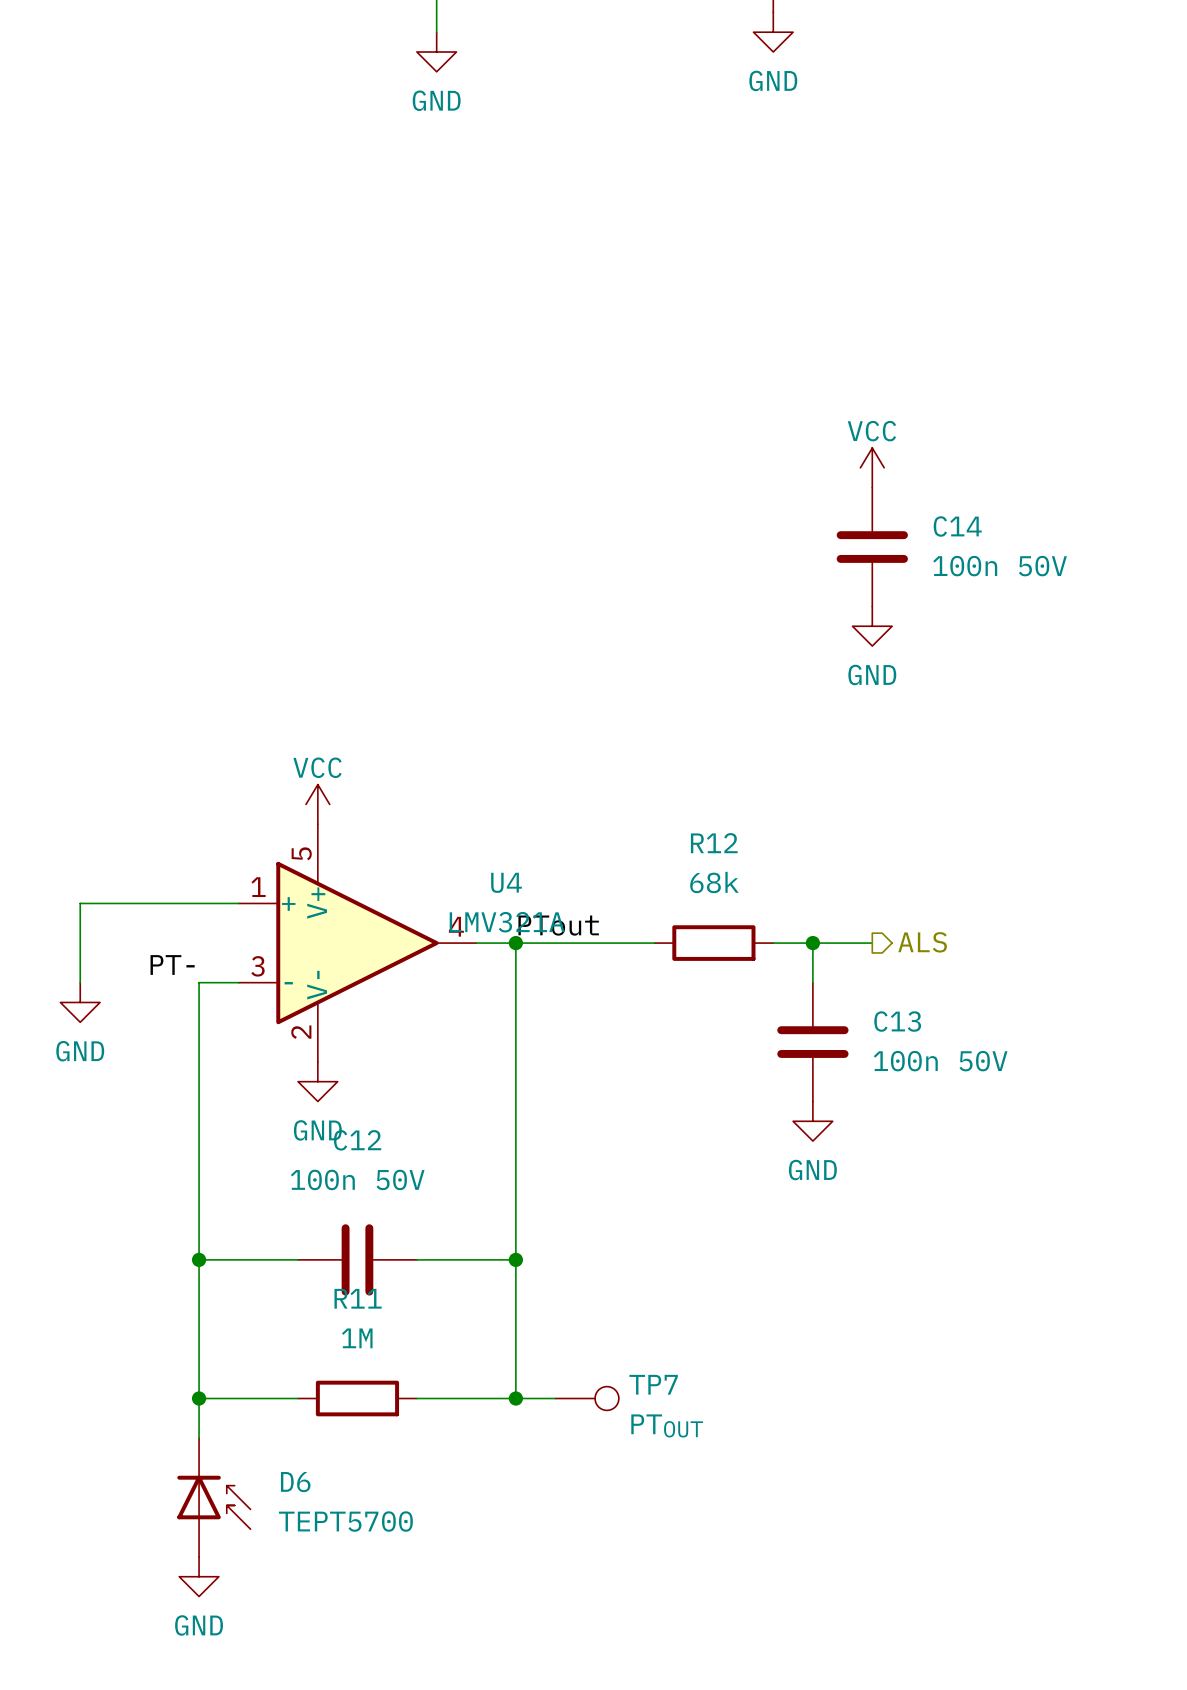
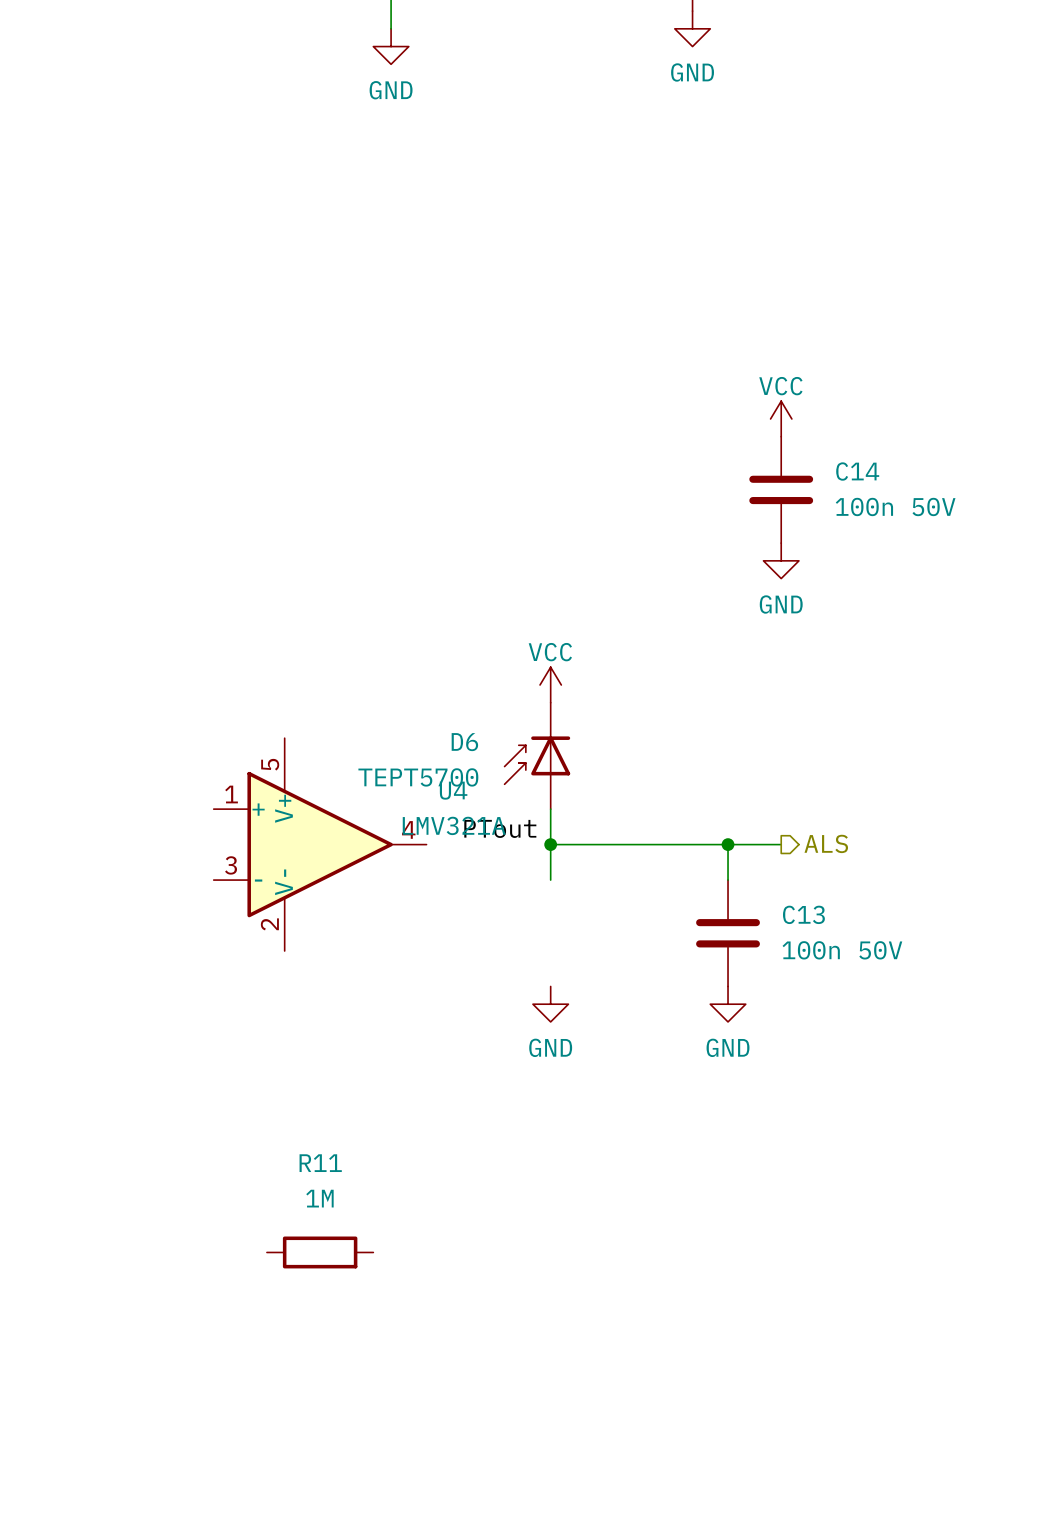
power symbol position: VCC (317, 804) -> VCC (550, 684)
wire: (238, 903) (80, 903) (80, 982) -> none
wire: none -> (550, 809) (550, 880)
wire: (476, 943) (614, 943) -> none
wire: (515, 943) (515, 1398) -> none
junction: (515, 943) -> none
junction: none -> (550, 844)
wire: none -> (586, 844) (692, 844)
R12: 68k (713, 943) -> none
label: PT- (172, 965) -> none
wire: (238, 982) (199, 982) (199, 1438) -> none
power symbol: GND (80, 1002) -> none
power symbol: GND (317, 1081) -> none
power symbol: none -> GND (550, 1004)
wire: (199, 1259) (298, 1259) -> none
junction: (199, 1259) -> none
C12: 100n 50V (357, 1259) -> none
wire: (416, 1259) (515, 1259) -> none
junction: (515, 1259) -> none
wire: (199, 1398) (298, 1398) -> none
junction: (199, 1398) -> none
wire: (416, 1398) (555, 1398) -> none
junction: (515, 1398) -> none
TP7: PTOUT (587, 1398) -> none
D6 position: (213, 1497) -> (537, 755)
D6 flip: as is (213, 1502) -> left-right (537, 760)
power symbol: GND (199, 1576) -> none

